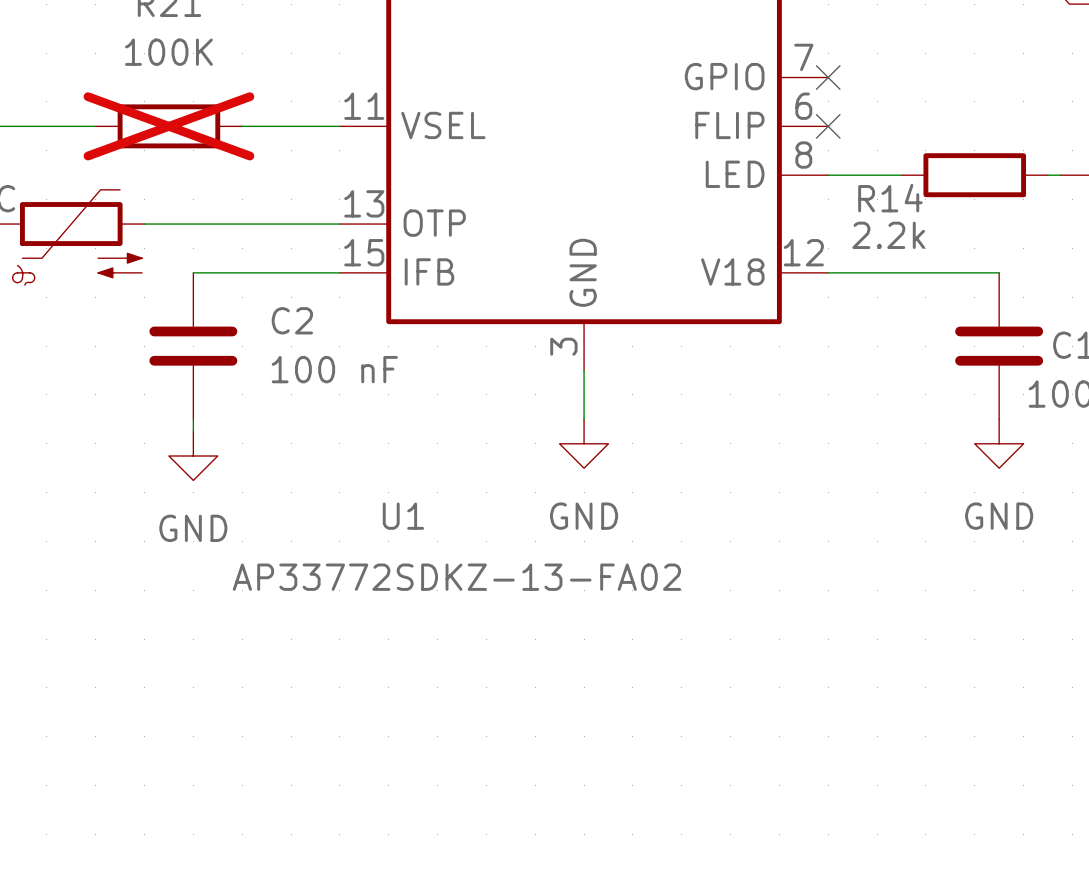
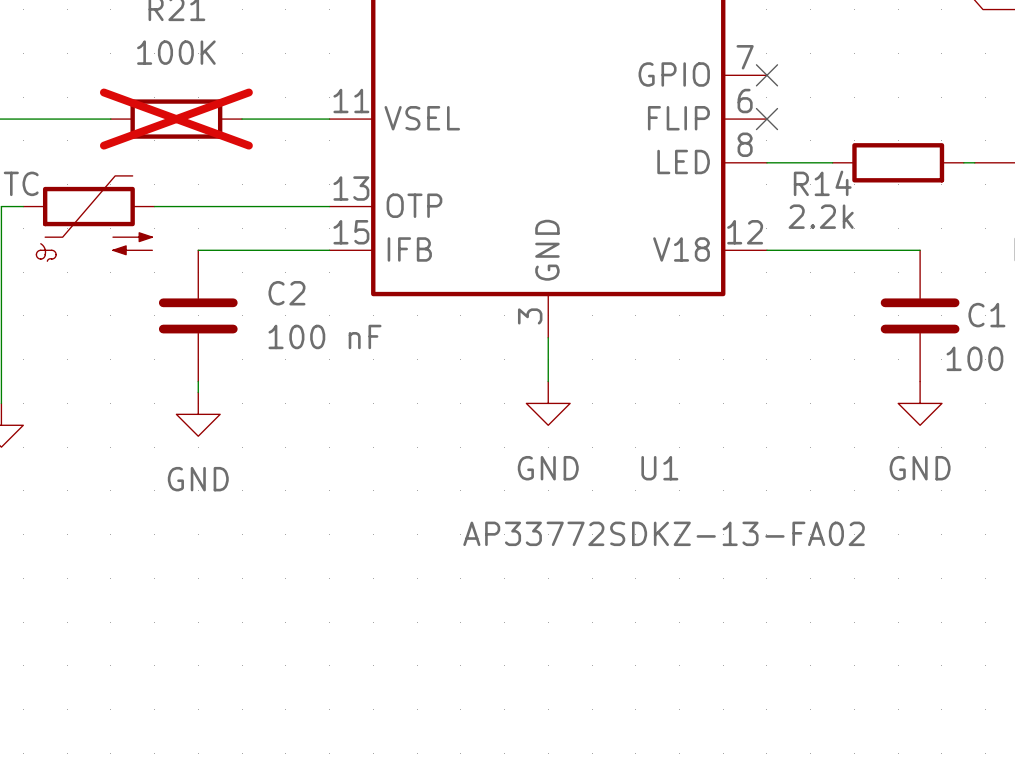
U1 name position: U1 (403, 516) -> U1 (659, 468)
U1 value position: AP33772SDKZ-13-FA02 (456, 577) -> AP33772SDKZ-13-FA02 (664, 533)

